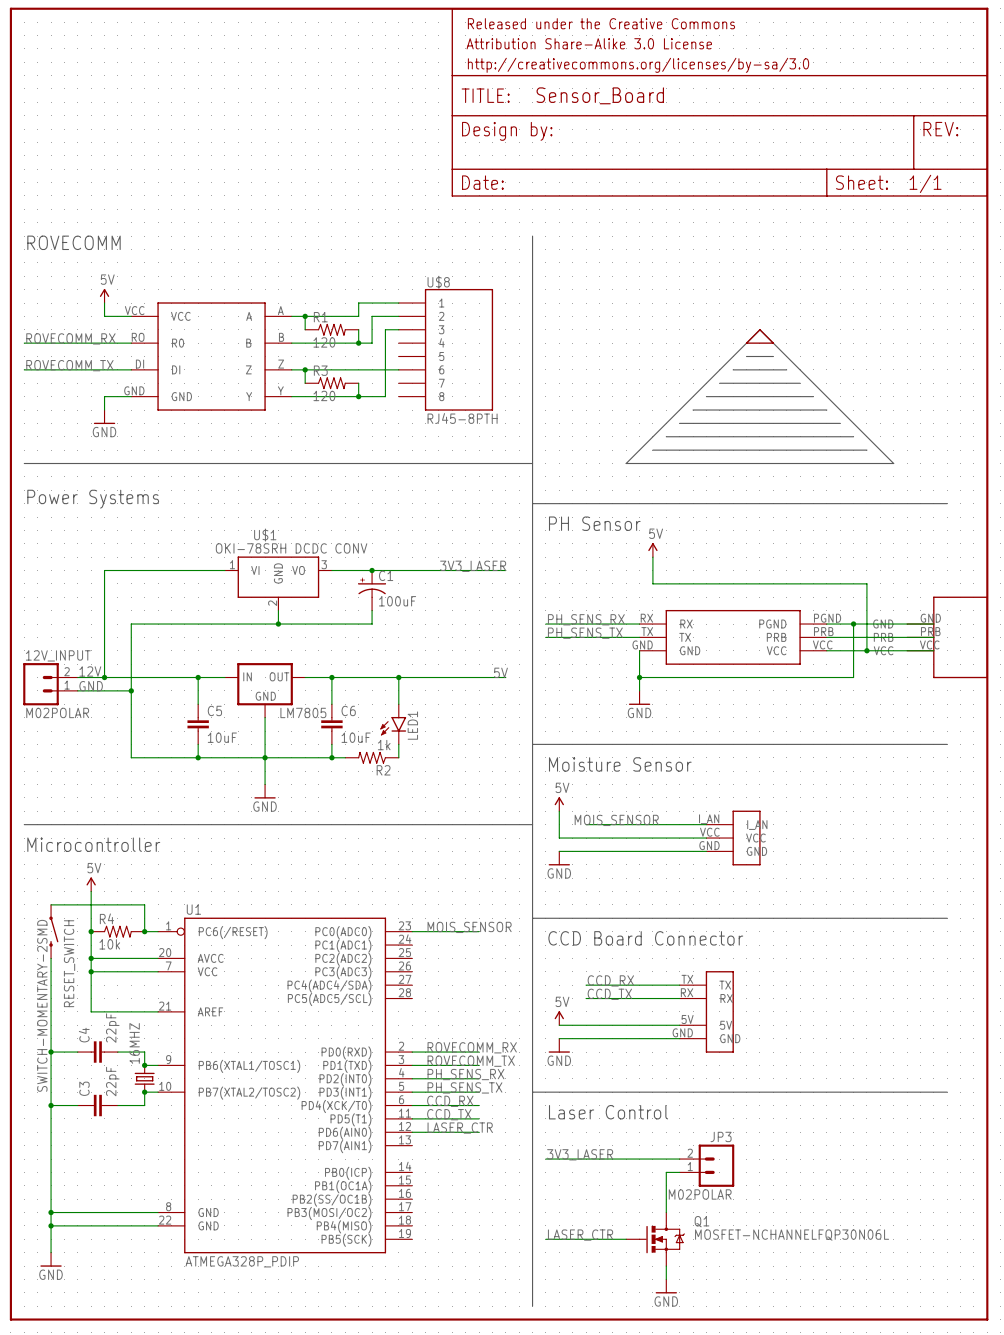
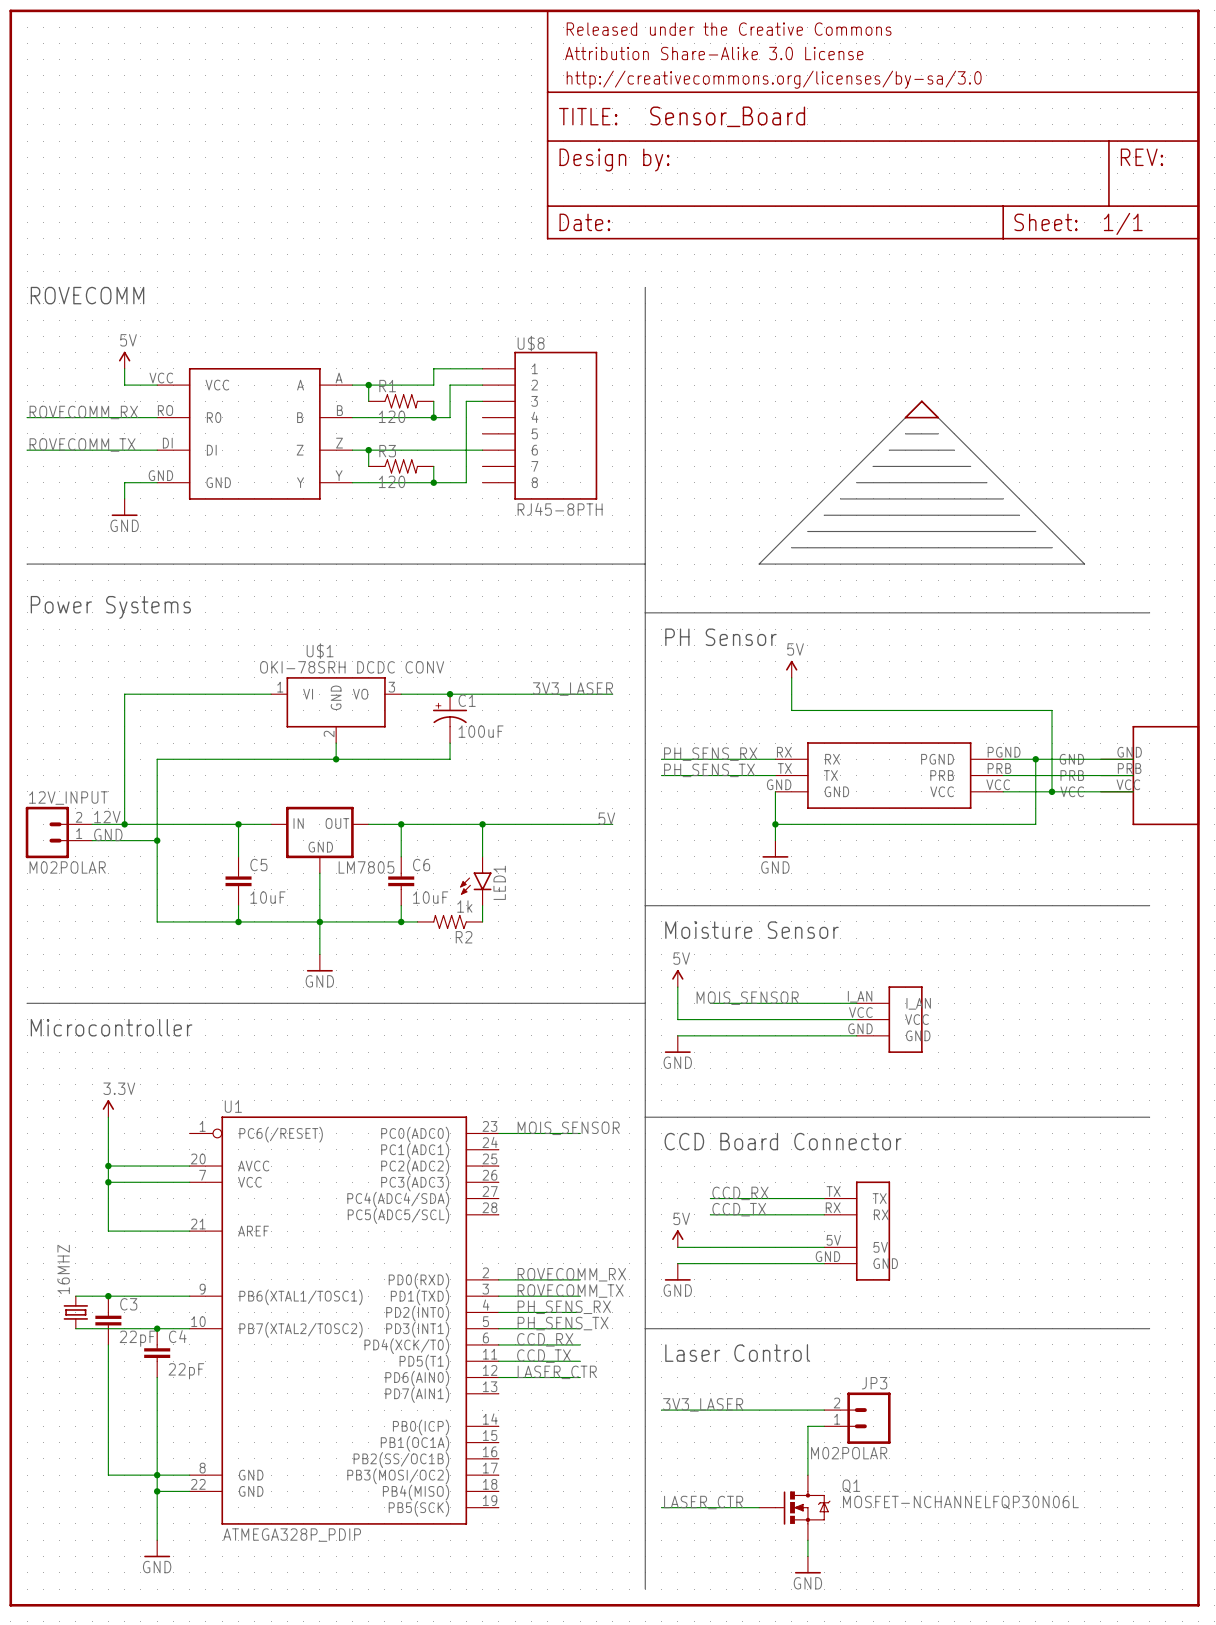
power symbol: 5V (91, 884) -> none
wire: (51, 904) (144, 904) (144, 931) (158, 931) -> none
power symbol: none -> 3.3V (108, 1108)
RESET_SWITCH: SWITCH-MOMENTARY-2SMD (53, 931) -> none
junction: (91, 931) -> none
R4: 10k (117, 931) -> none
junction: (144, 931) -> none
wire: (51, 958) (51, 1252) -> none
wire: (51, 1052) (77, 1052) -> none
junction: (51, 1052) -> none
C4 rotation: 0° (97, 1052) -> 90° clockwise (157, 1353)
C4 position: (97, 1052) -> (157, 1353)
wire: (117, 1052) (144, 1052) (144, 1065) -> (75, 1296) (173, 1296)
junction: none -> (108, 1296)
junction: (144, 1065) -> none
16MHZ position: (144, 1078) -> (75, 1312)
wire: (144, 1092) (144, 1105) (117, 1105) -> (173, 1328) (75, 1328)
junction position: (144, 1092) -> (157, 1328)
wire: (51, 1105) (77, 1105) -> none
junction: (51, 1105) -> none
C3 rotation: 0° (97, 1105) -> 90° clockwise (108, 1320)
wire: none -> (157, 1377) (157, 1540)
wire: (51, 1212) (91, 1212) -> (108, 1344) (108, 1475)
junction: (51, 1212) -> none
junction: none -> (157, 1475)
wire: (51, 1225) (131, 1225) -> none
junction: (51, 1225) -> none
junction: none -> (157, 1491)
power symbol position: GND (51, 1259) -> GND (157, 1548)

